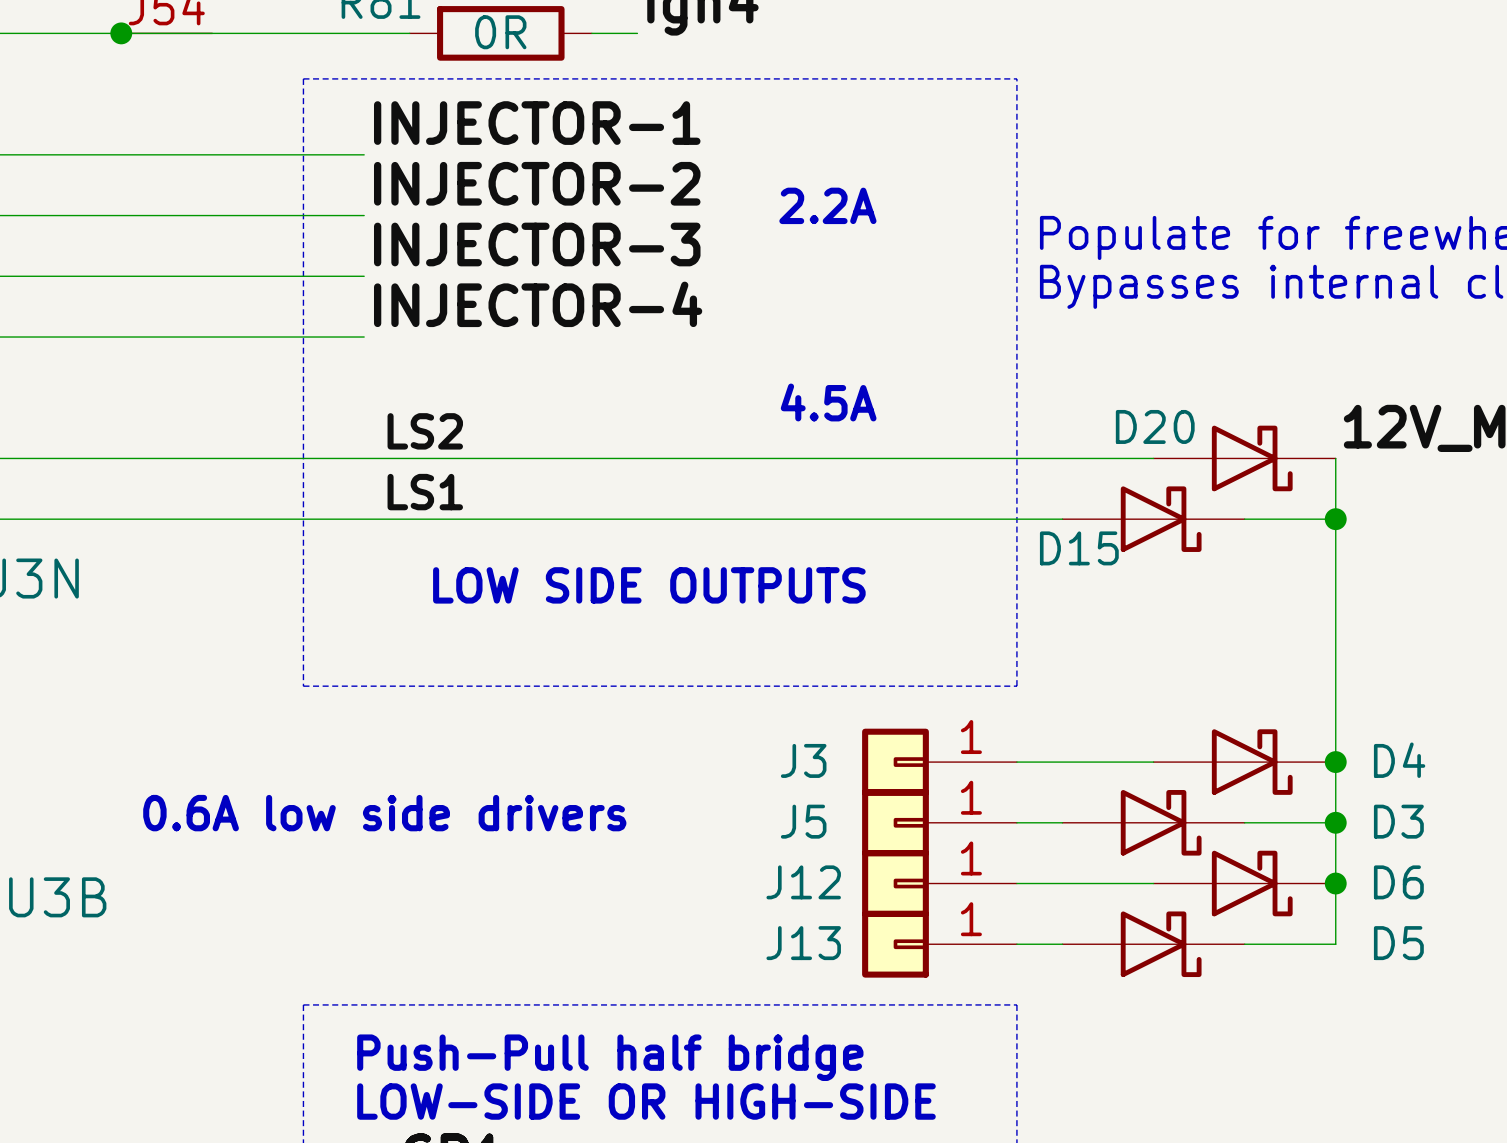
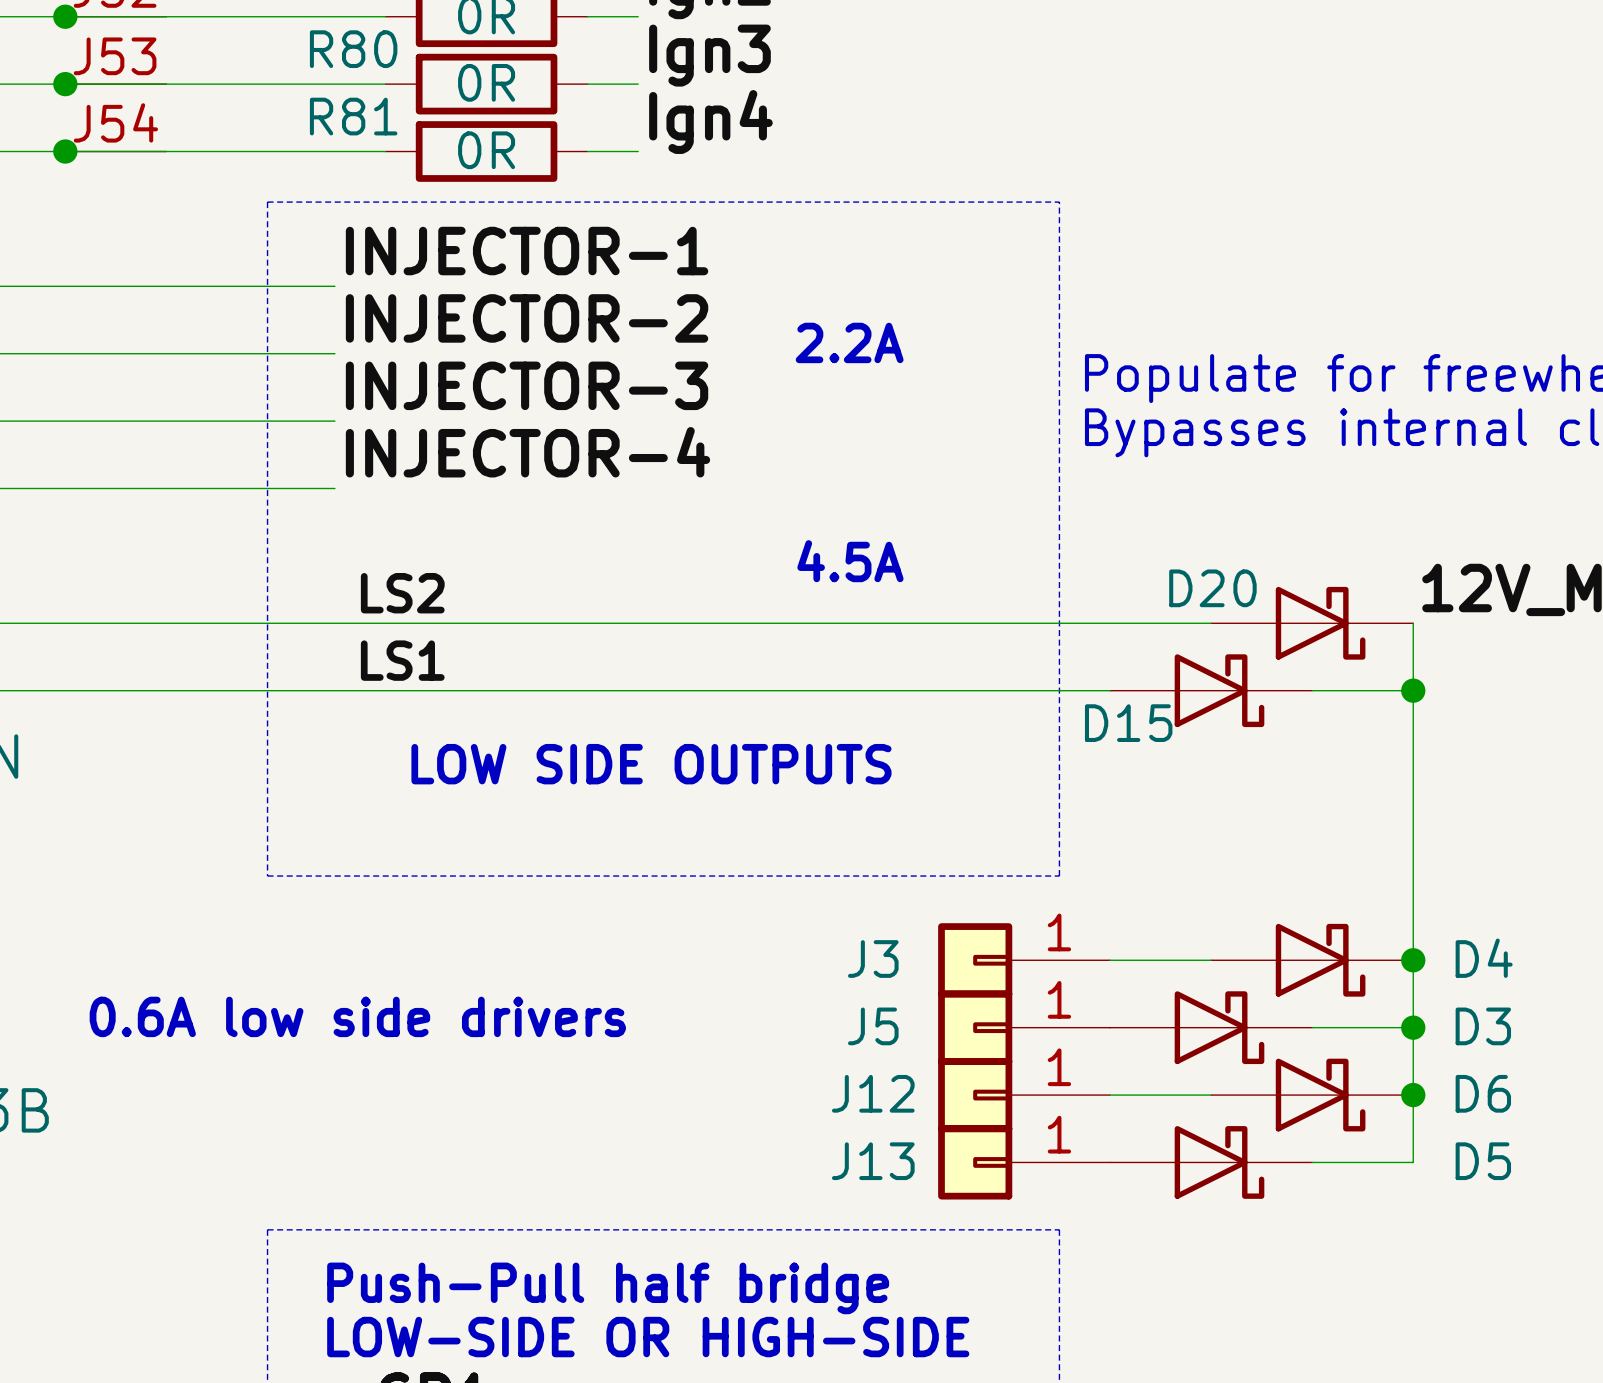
J3 position: (939, 762) -> (1024, 960)
J5 position: (939, 822) -> (1024, 1027)
J12 position: (939, 883) -> (1024, 1095)
J13 position: (939, 944) -> (1024, 1162)

